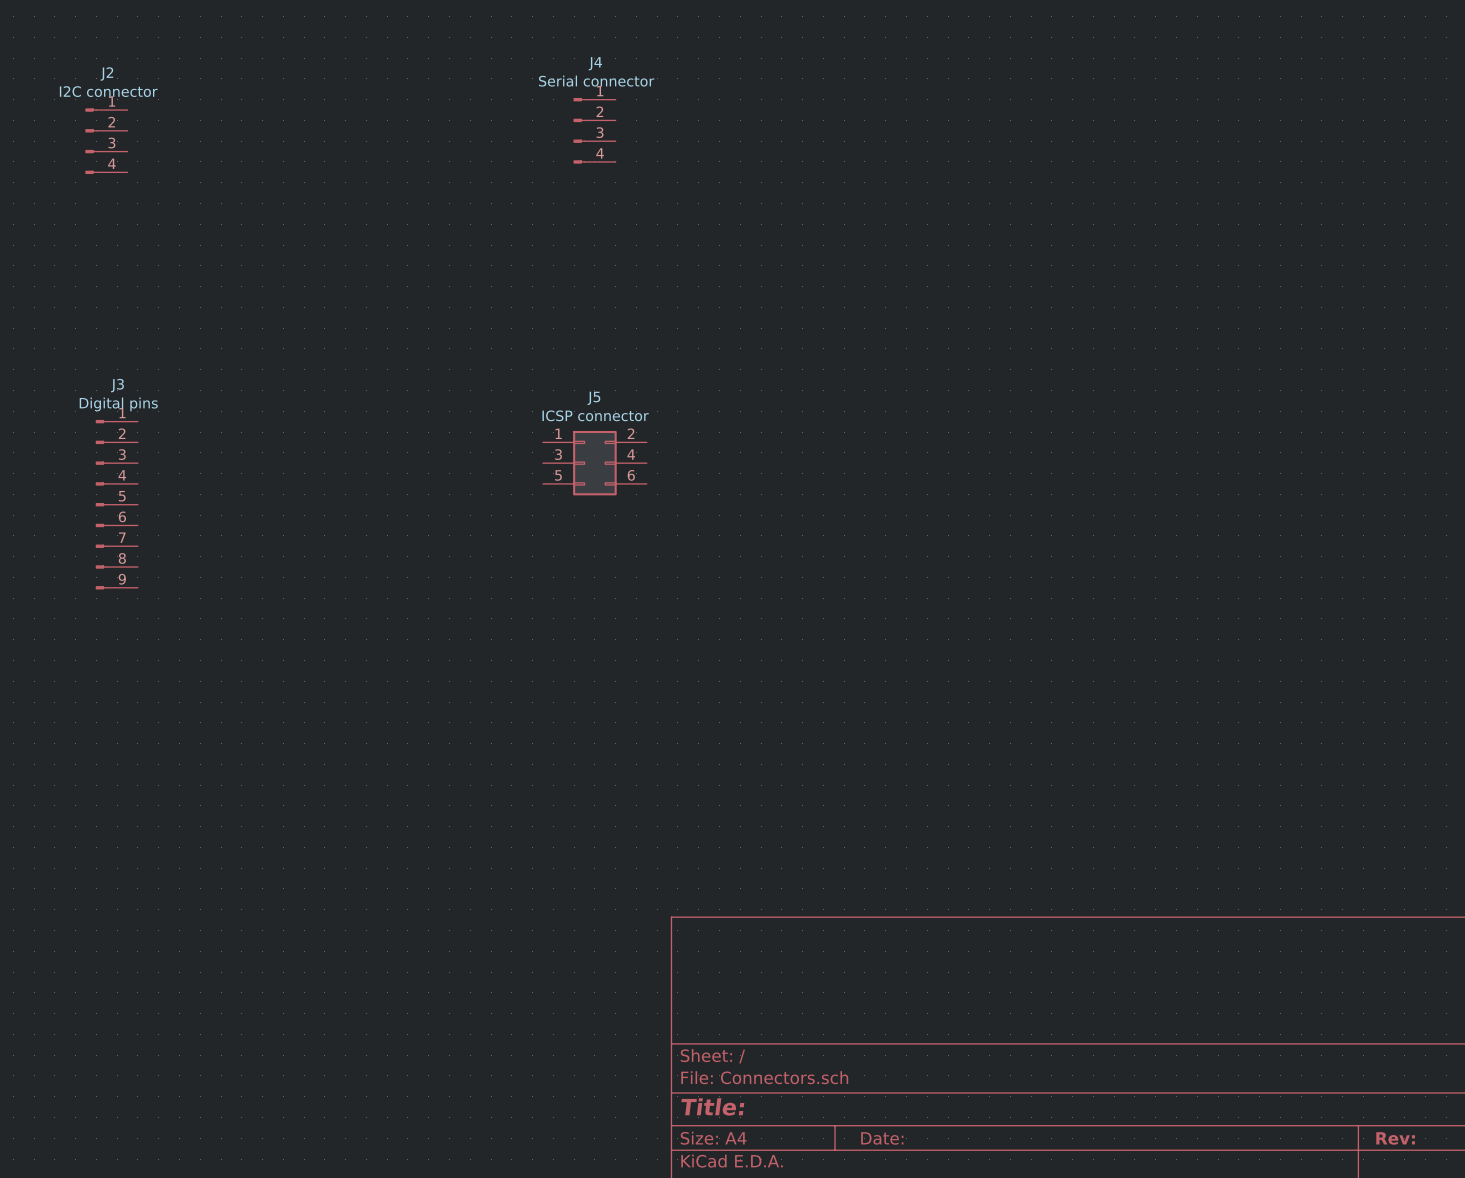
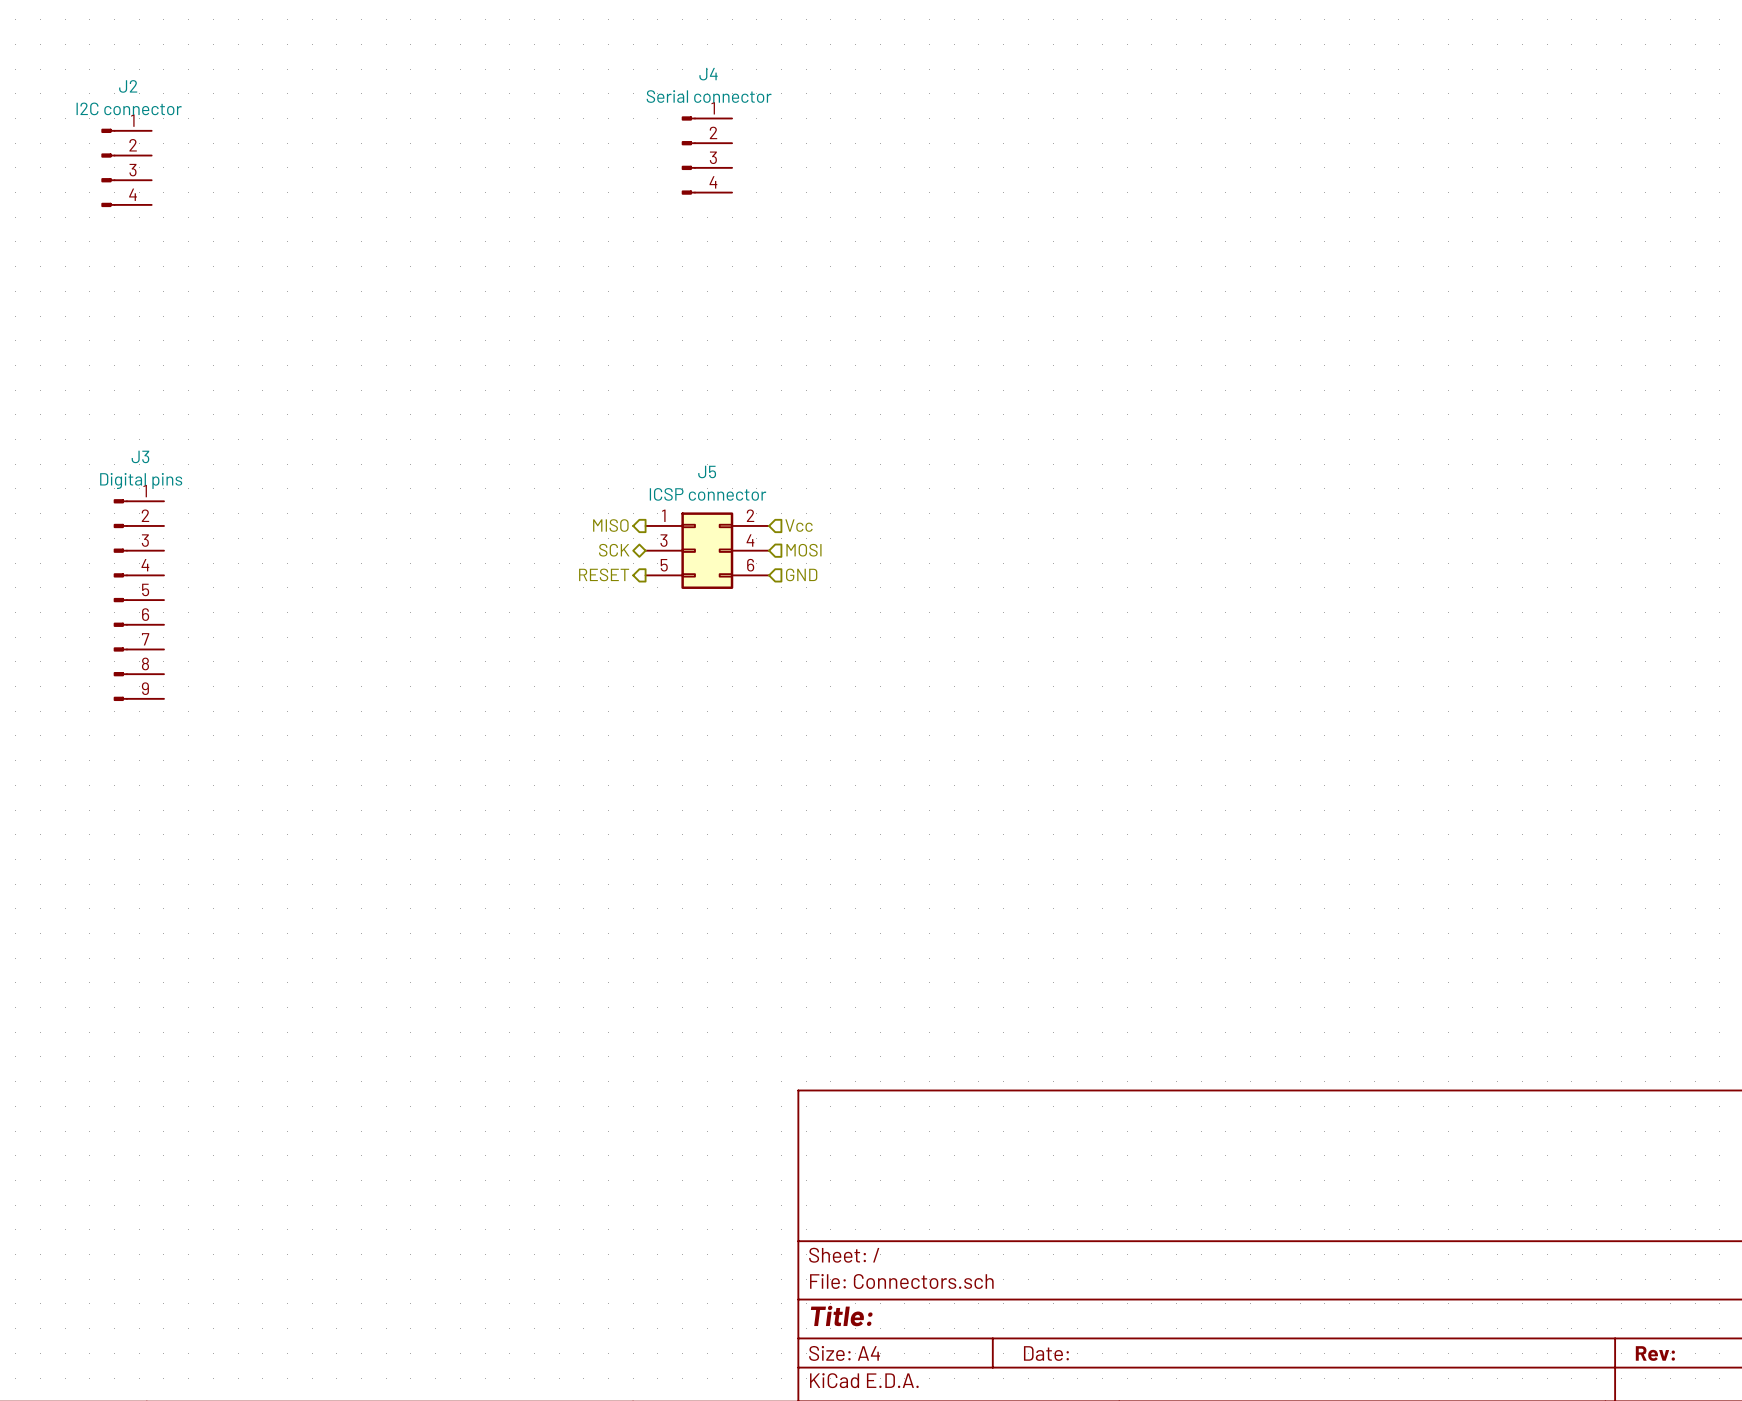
hierarchical label: none -> MISO (610, 525)
hierarchical label: none -> Vcc (799, 525)
hierarchical label: none -> SCK (614, 550)
hierarchical label: none -> MOSI (803, 550)
hierarchical label: none -> RESET (604, 574)
hierarchical label: none -> GND (801, 574)

